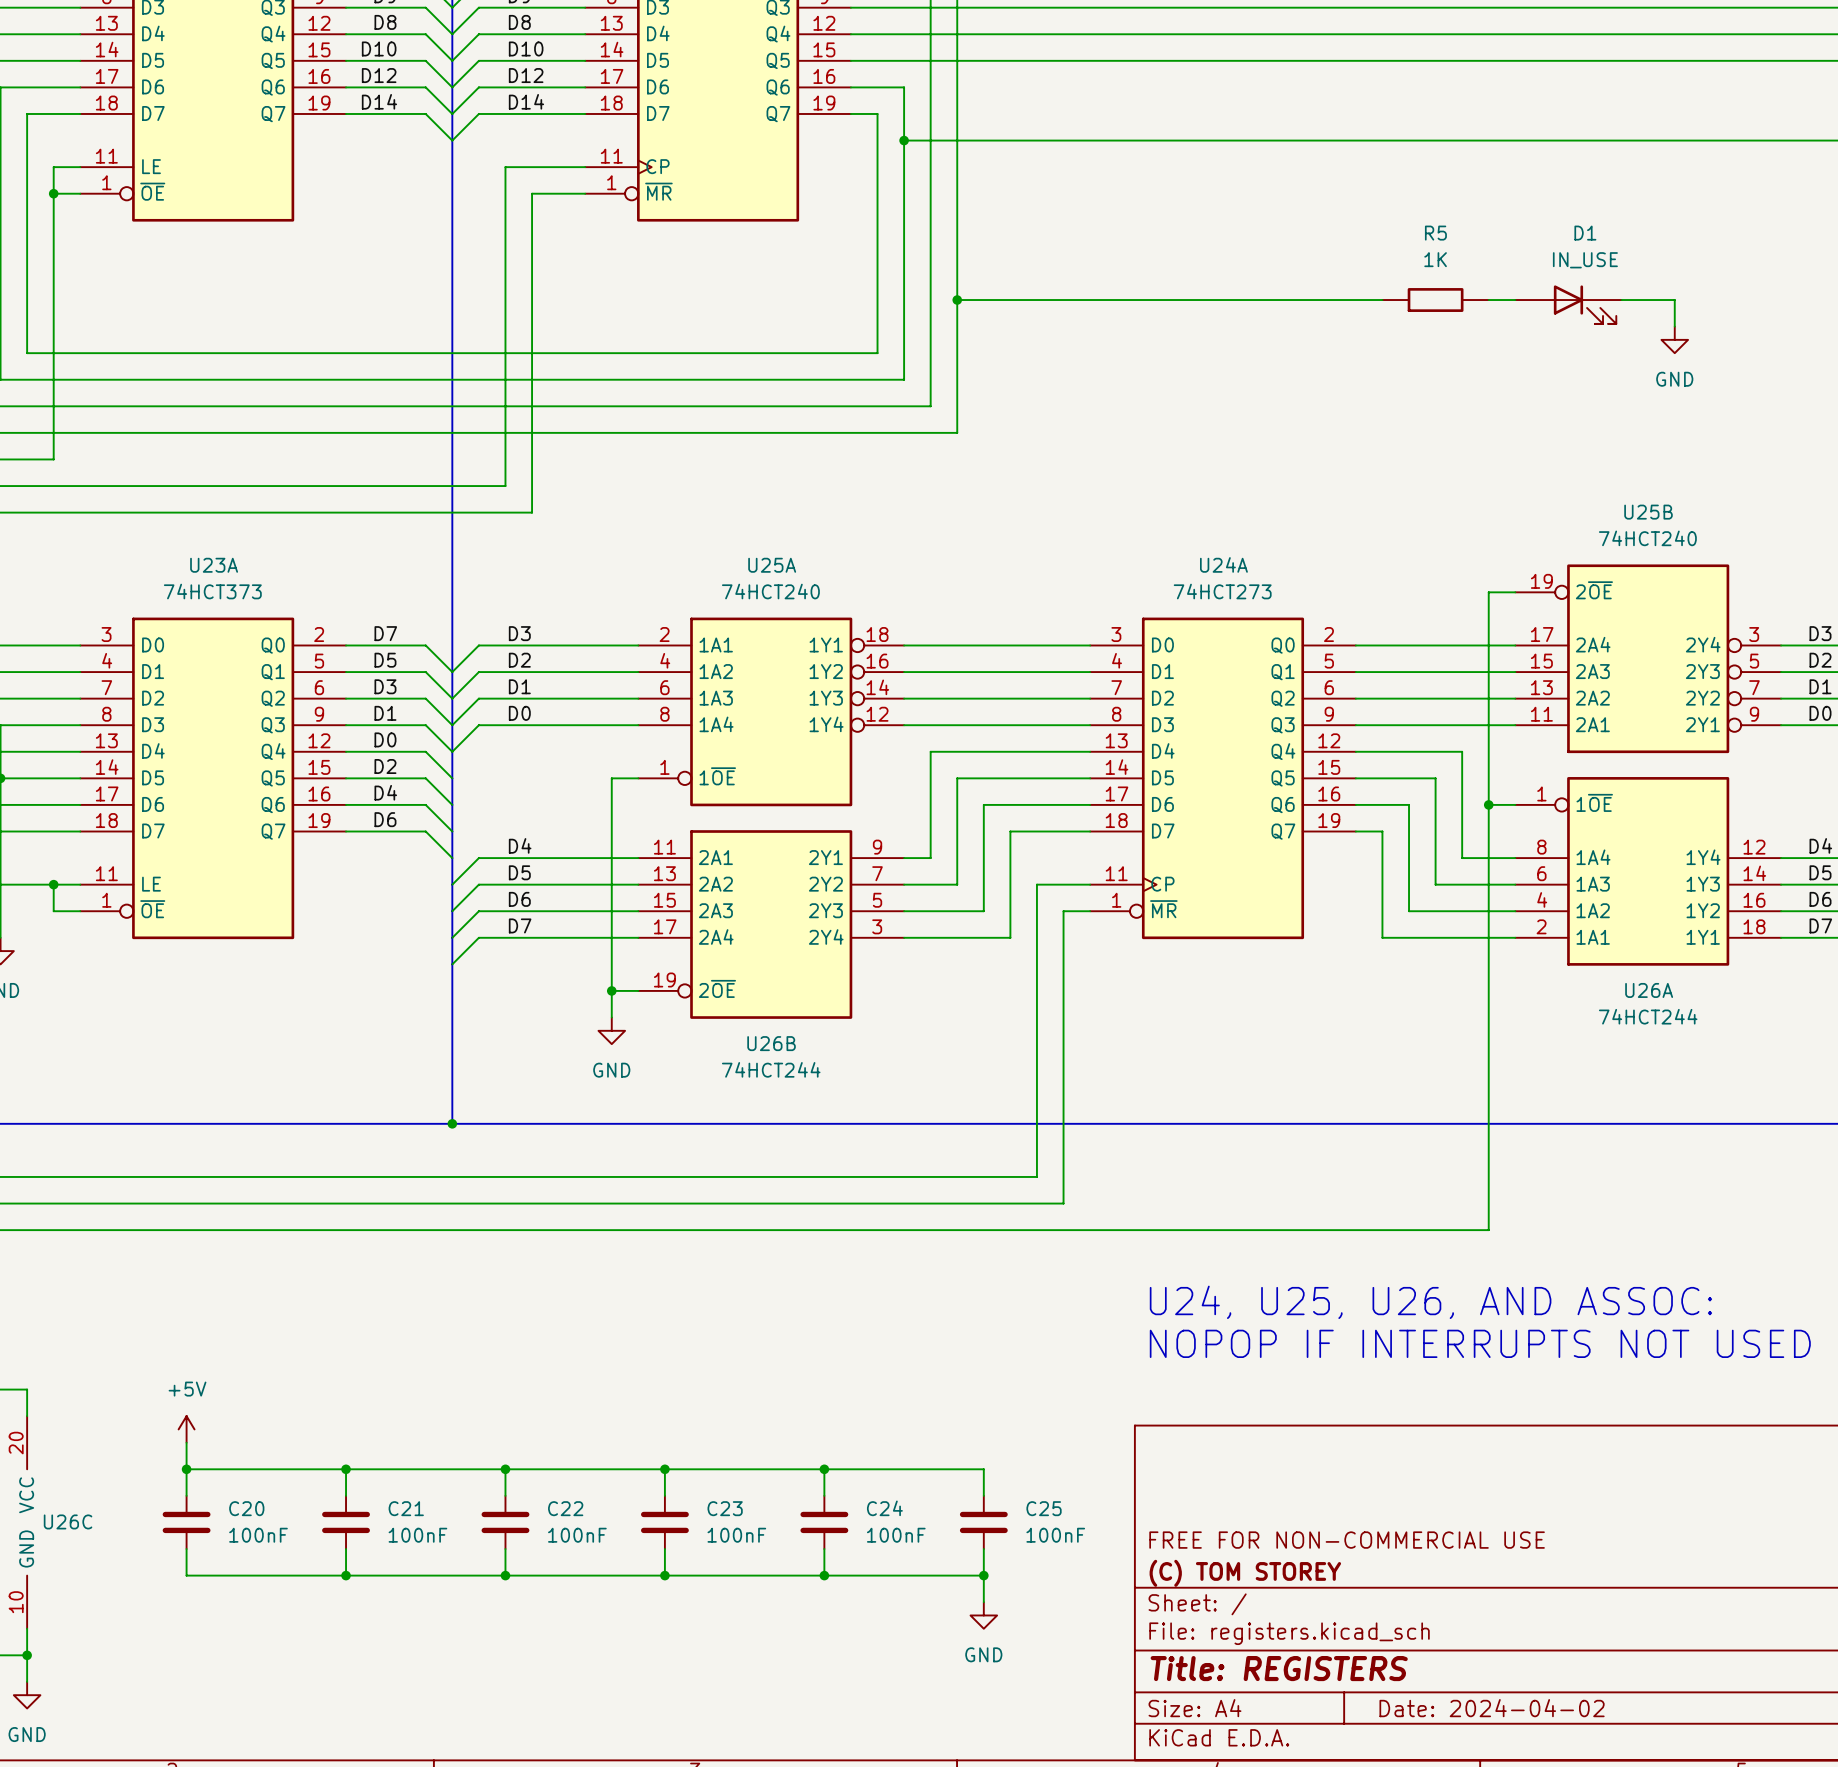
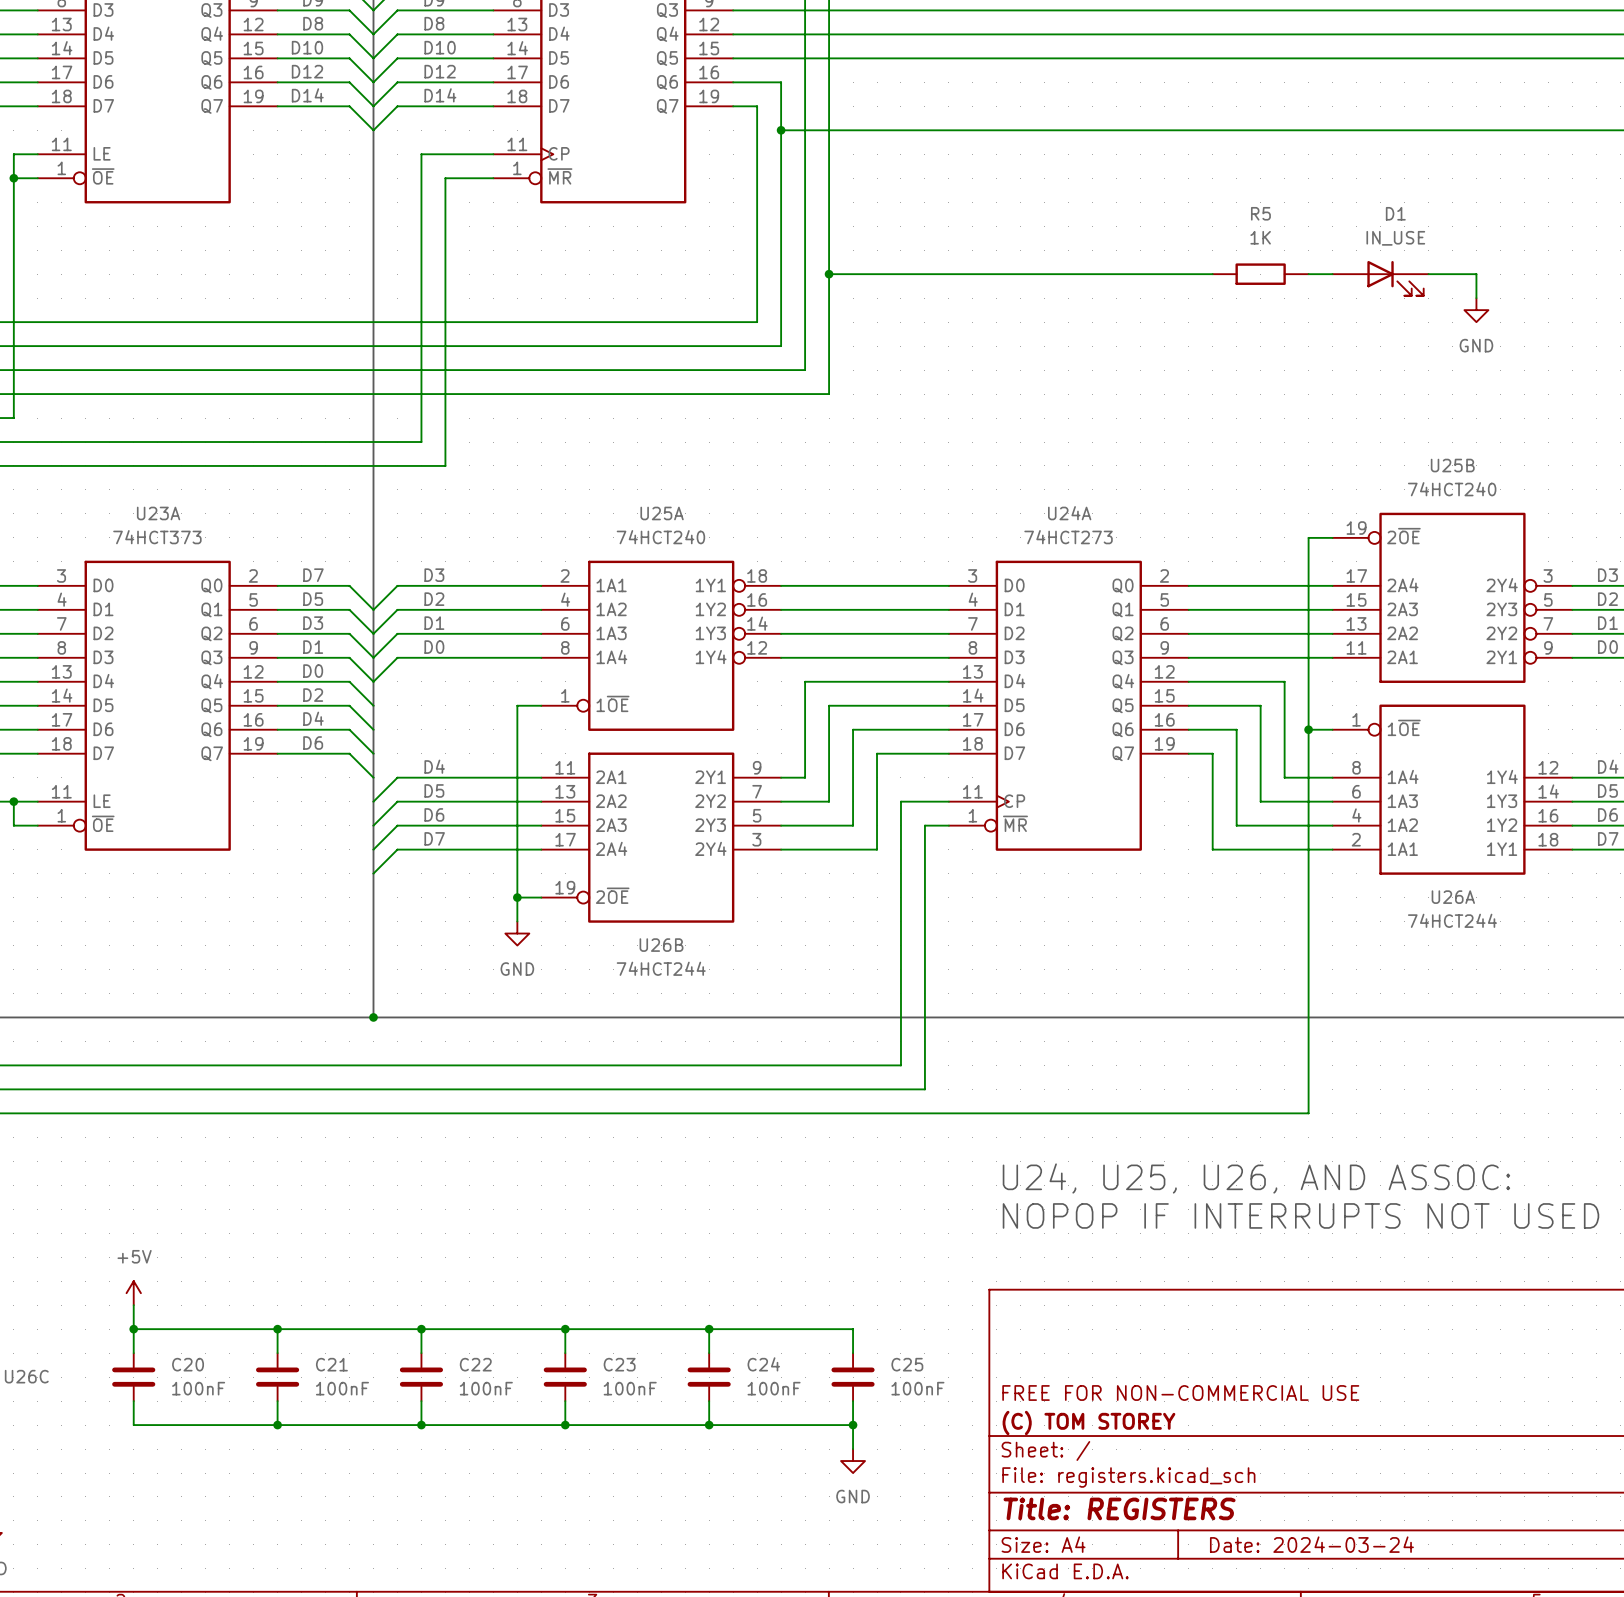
title block: Date: 2024-04-02 (1492, 1708) -> Date: 2024-03-24 (1311, 1544)

